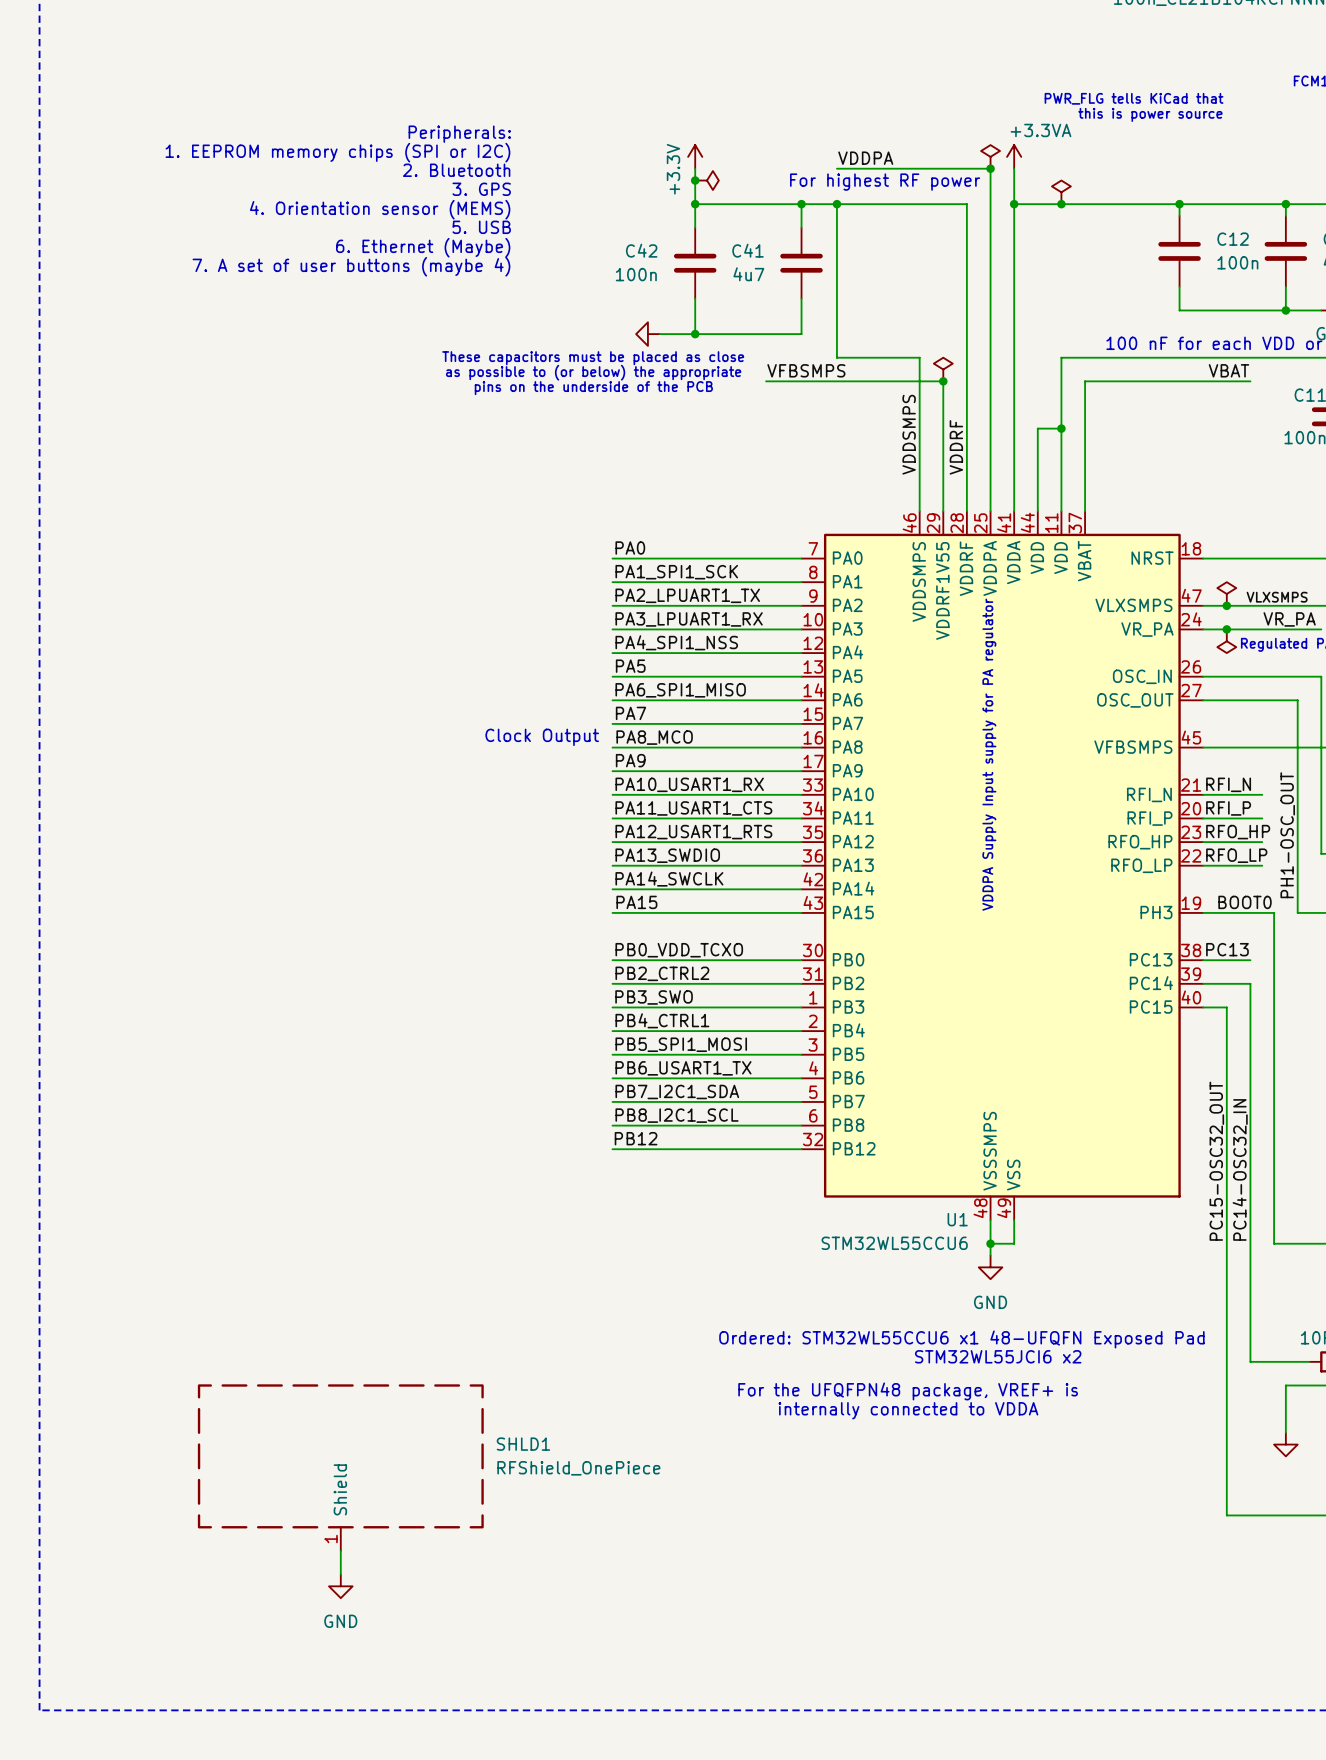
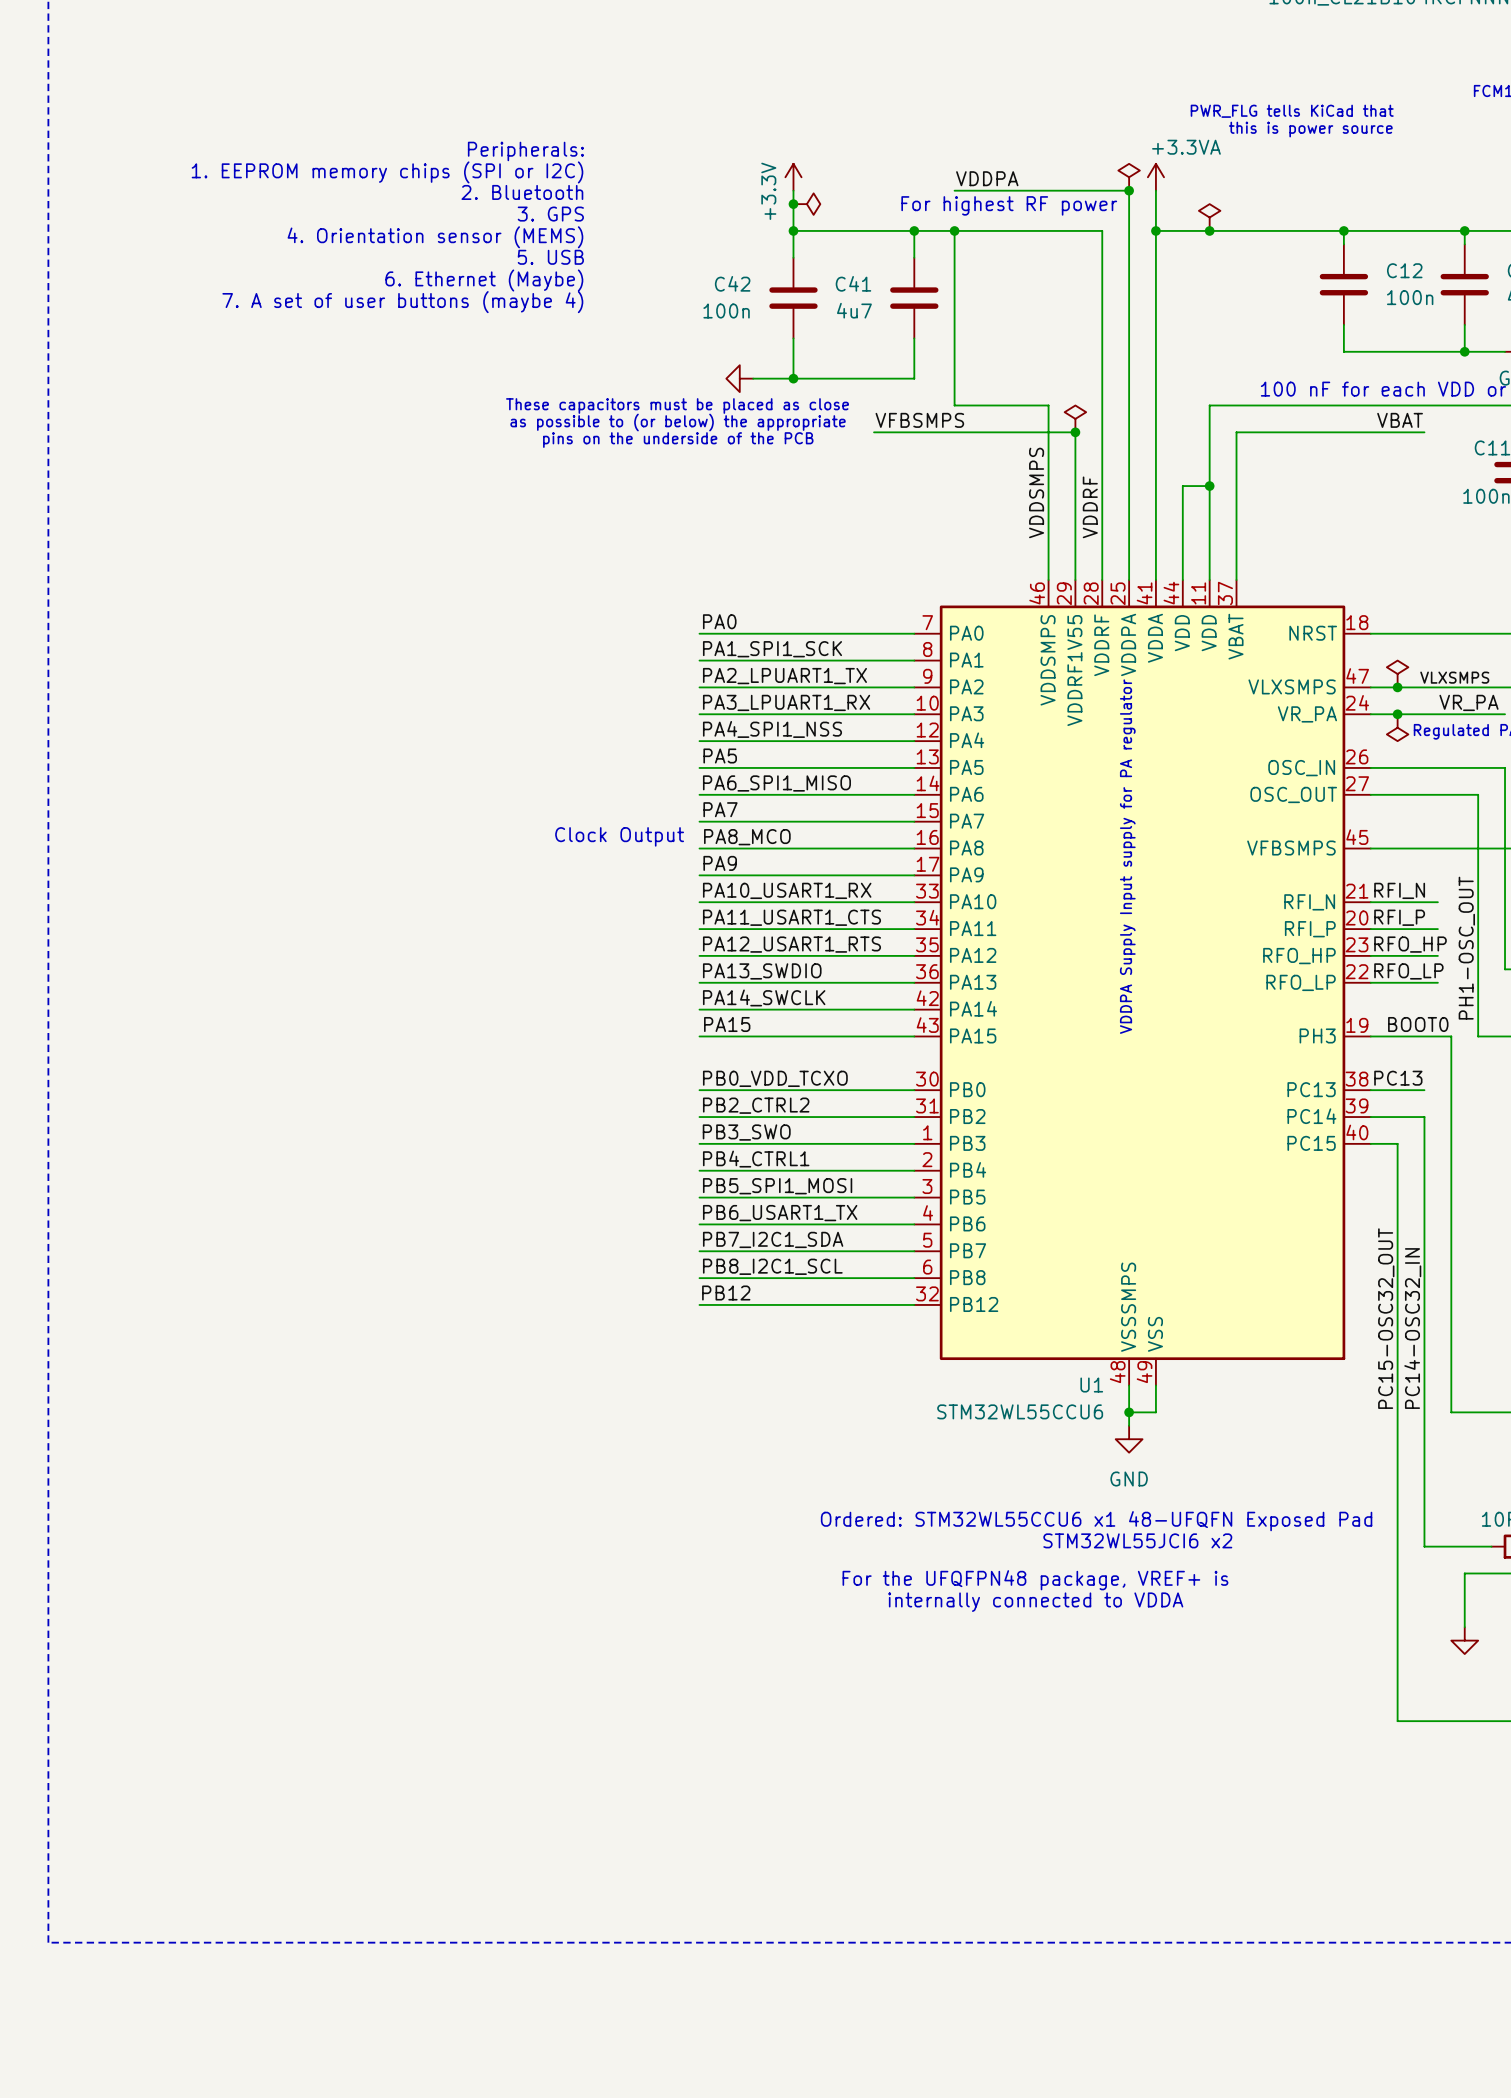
SHLD1: RFShield_OnePiece (340, 1467) -> none
wire: (340, 1550) (340, 1574) -> none
power symbol: GND (340, 1586) -> none

